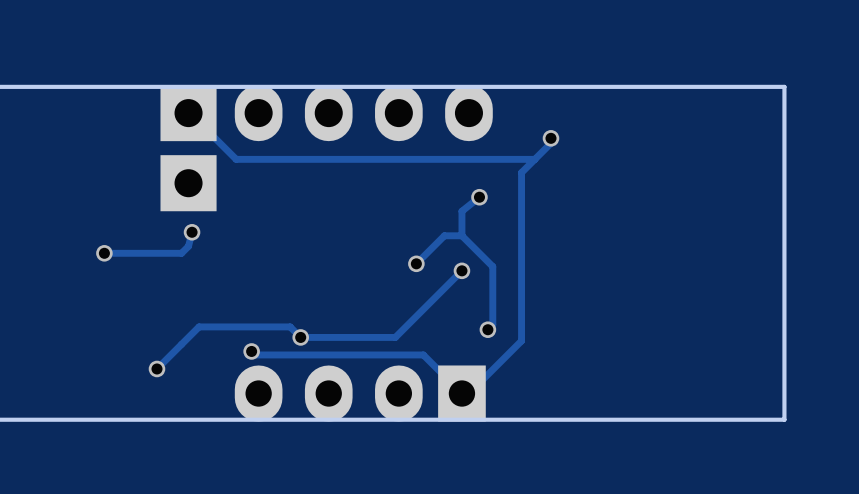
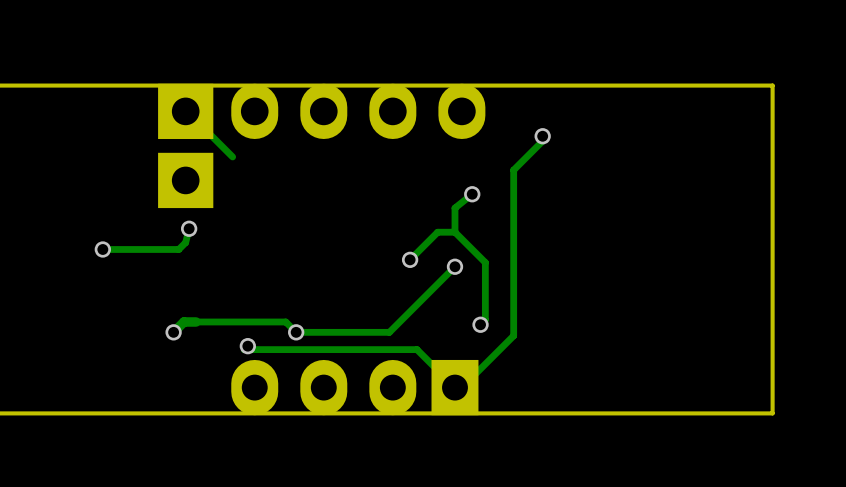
track: (534, 159) (236, 159) -> none
track: (199, 326) (156, 368) -> (196, 321) (183, 321) (173, 332)
via position: (156, 368) -> (173, 332)

